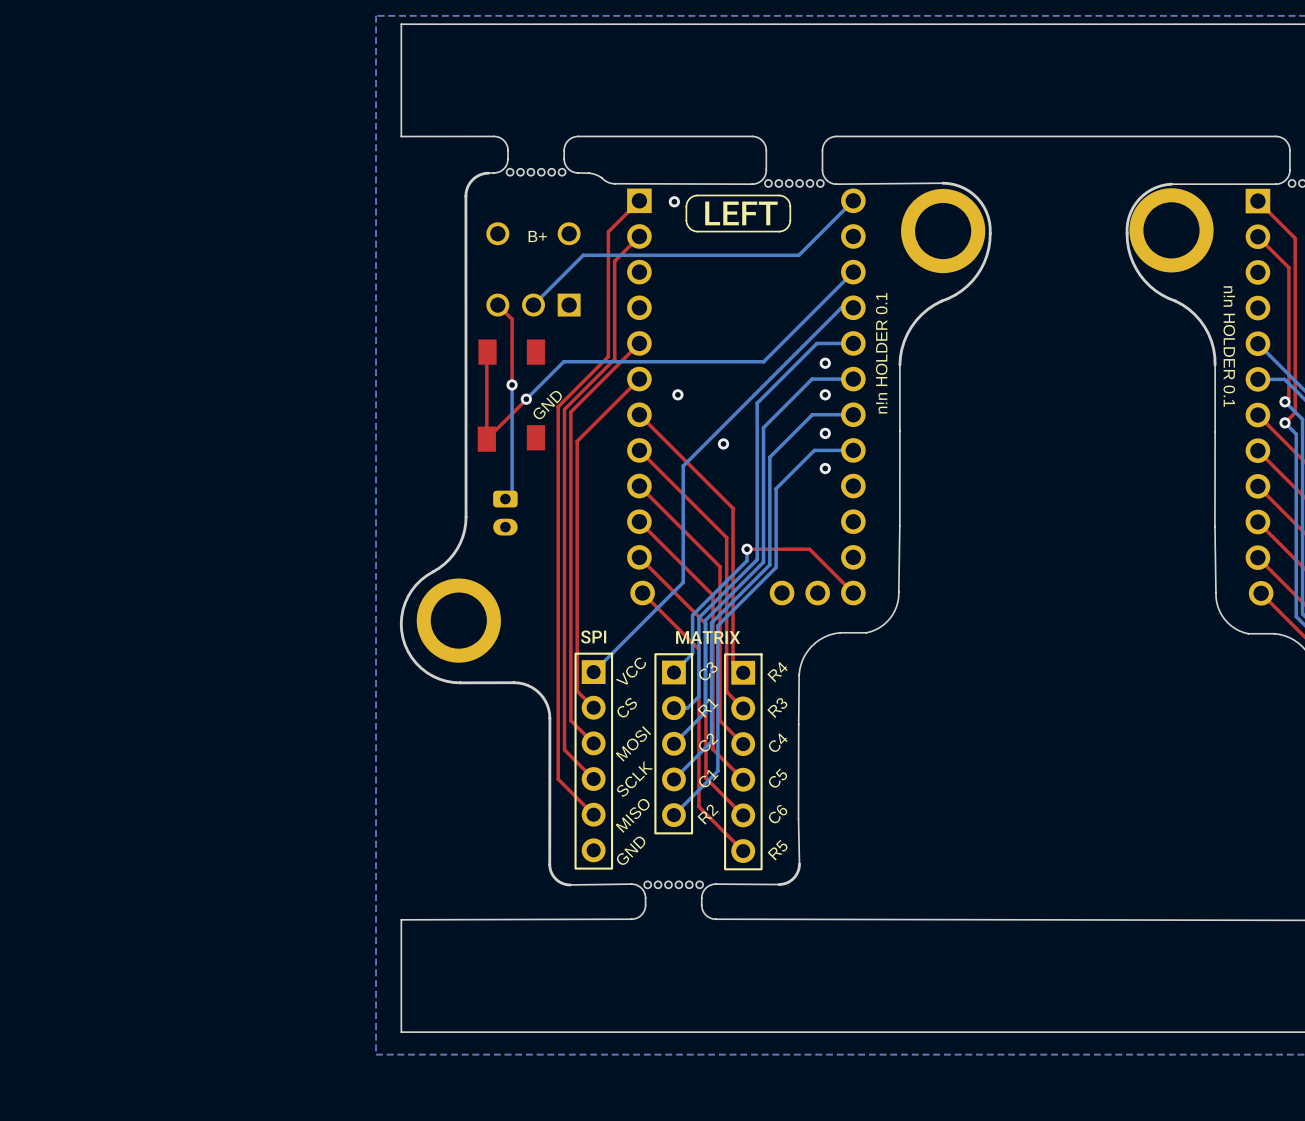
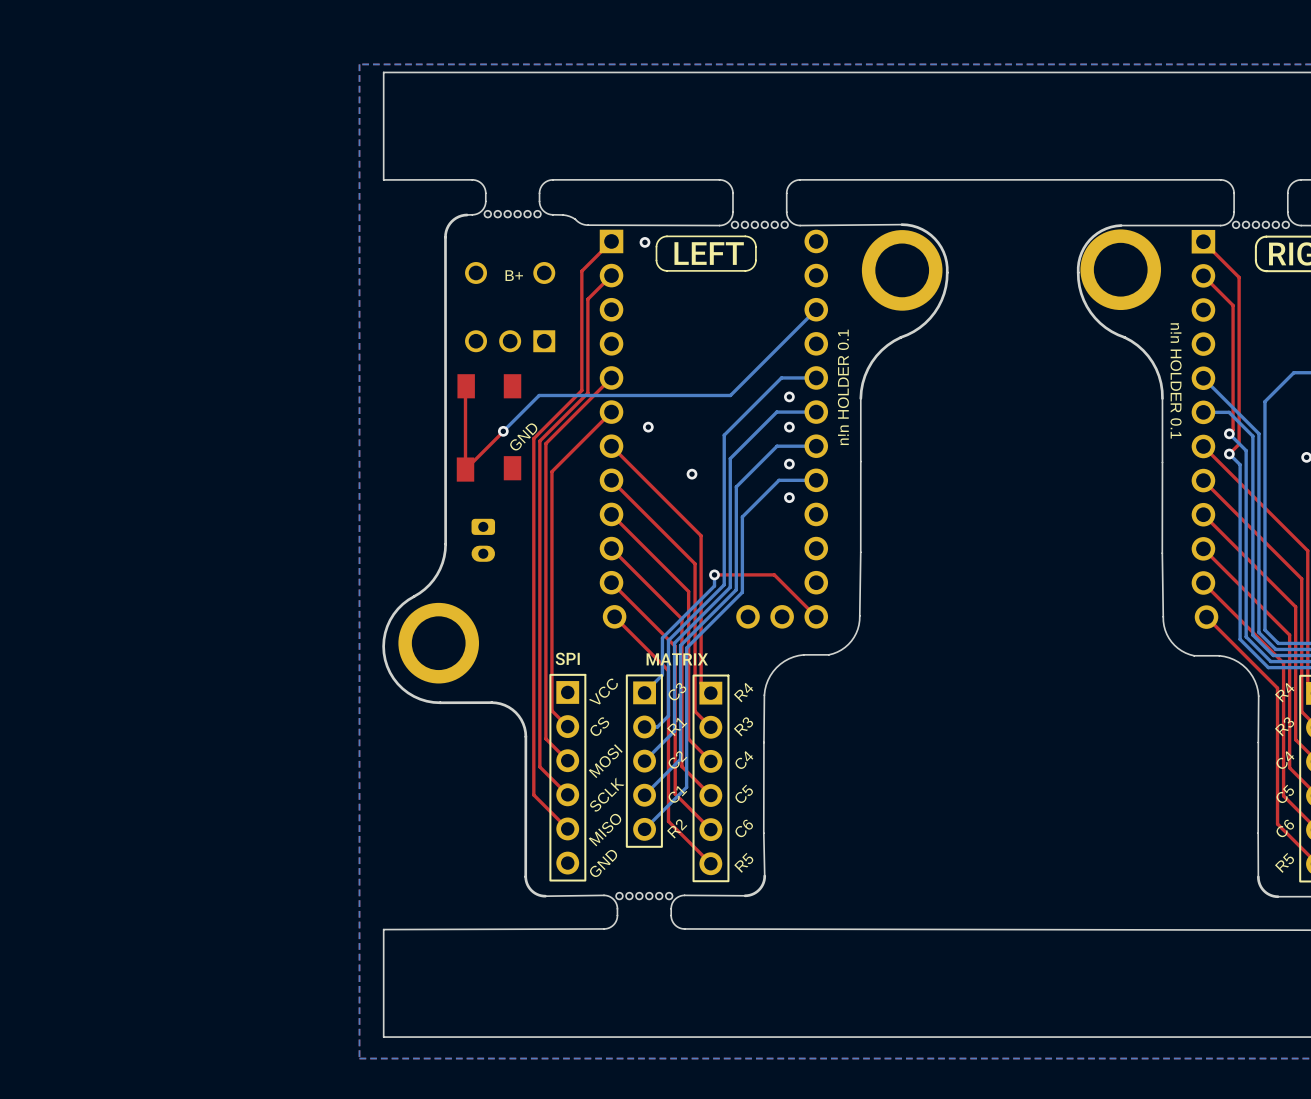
bottom track: (853, 200) (798, 255) (583, 255) (533, 305) -> none
top track: (497, 305) (512, 319) (512, 384) -> none
bottom track: (853, 307) (841, 307) (683, 466) (683, 582) (593, 672) -> none
bottom track: (512, 384) (512, 492) (505, 499) -> none
via: (512, 384) -> none

